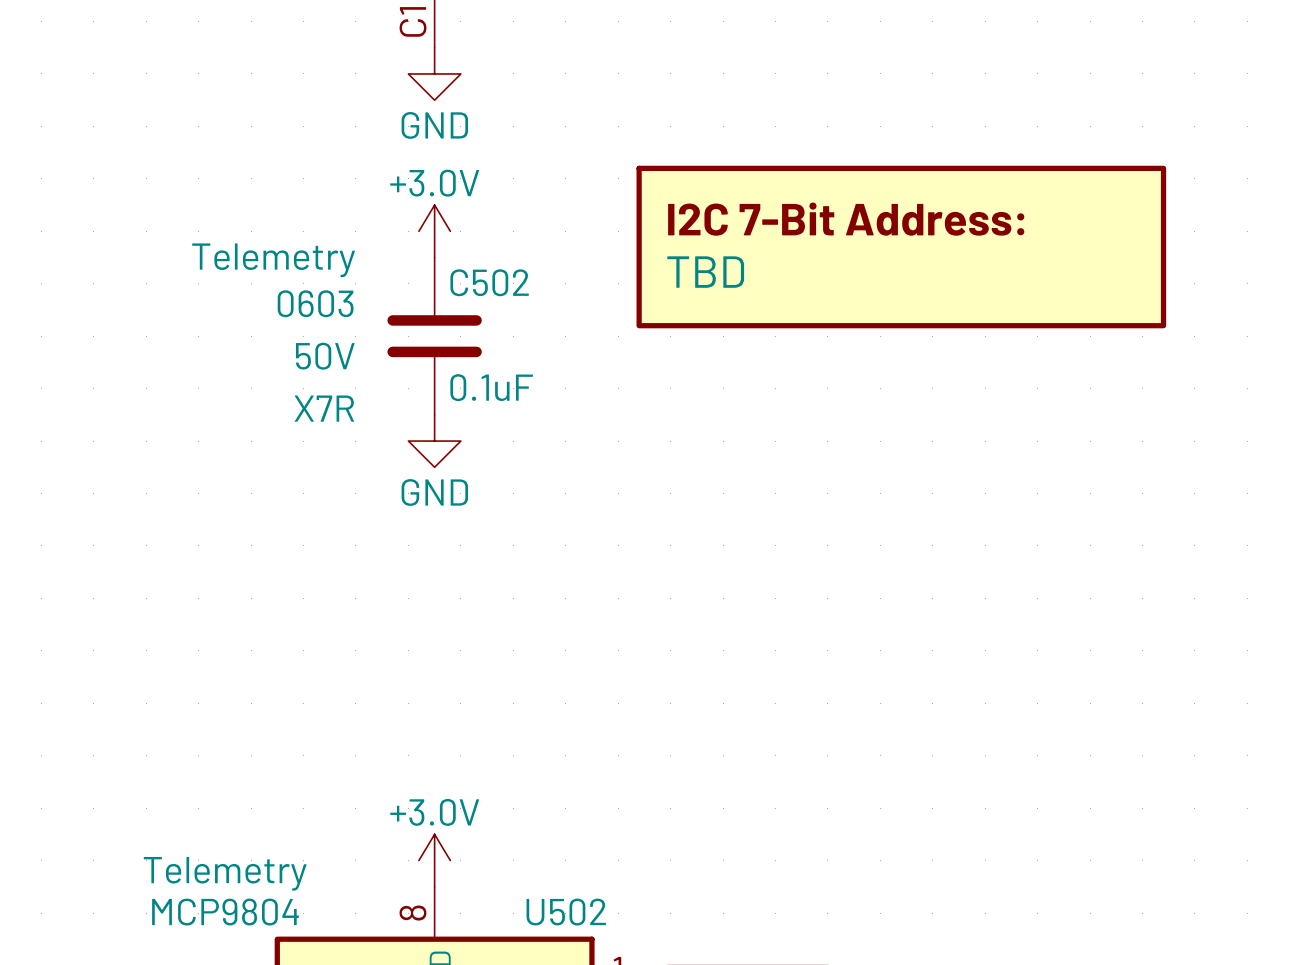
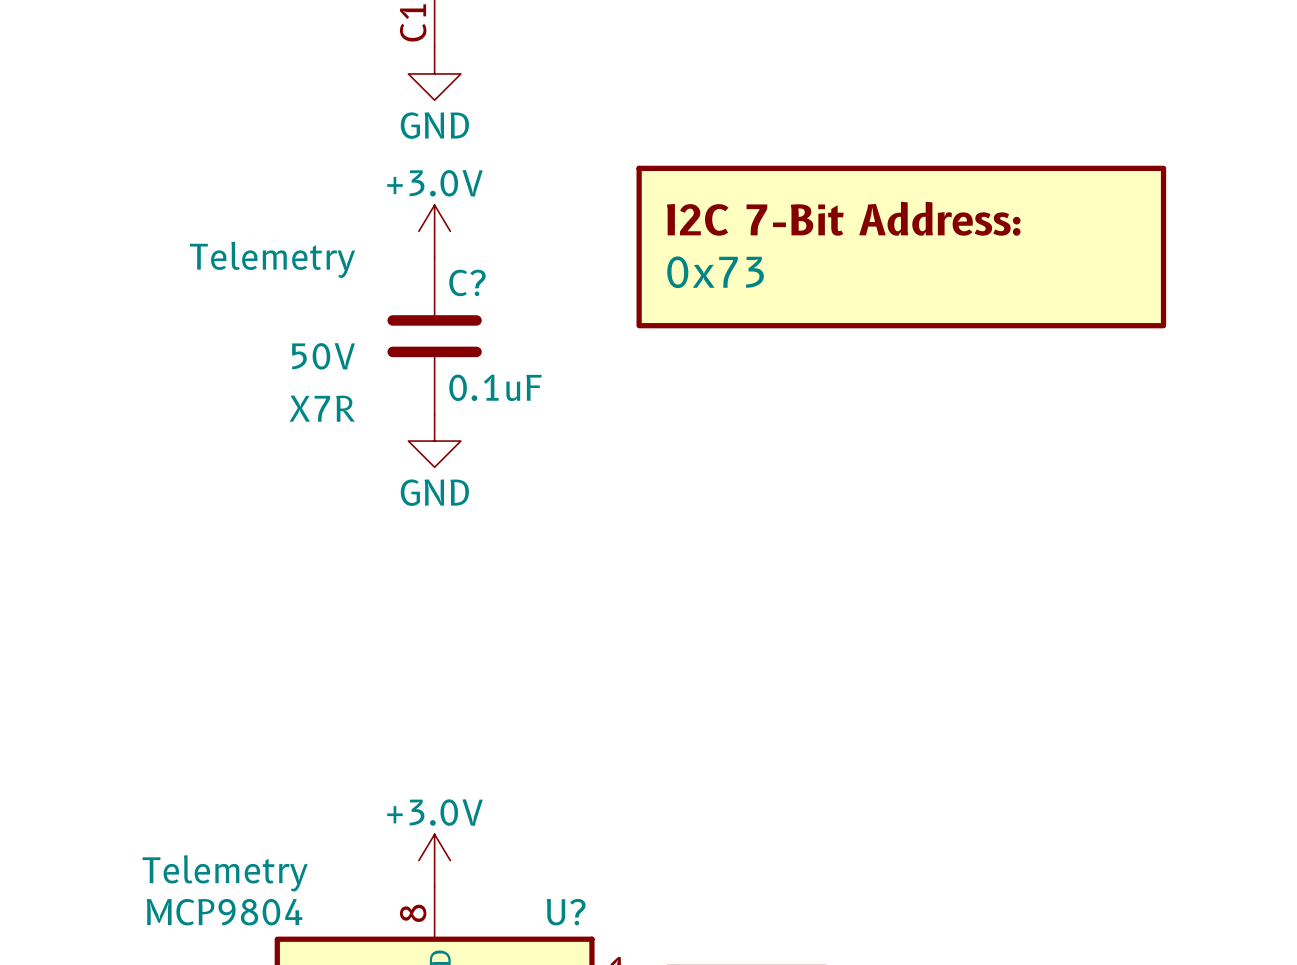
part value: TBD (705, 272) -> 0x73 (715, 272)
C502 name: C502 (489, 282) -> C? (467, 282)
C502 text: 0603 (315, 303) -> none
U502 name: U502 (566, 912) -> U? (566, 912)

